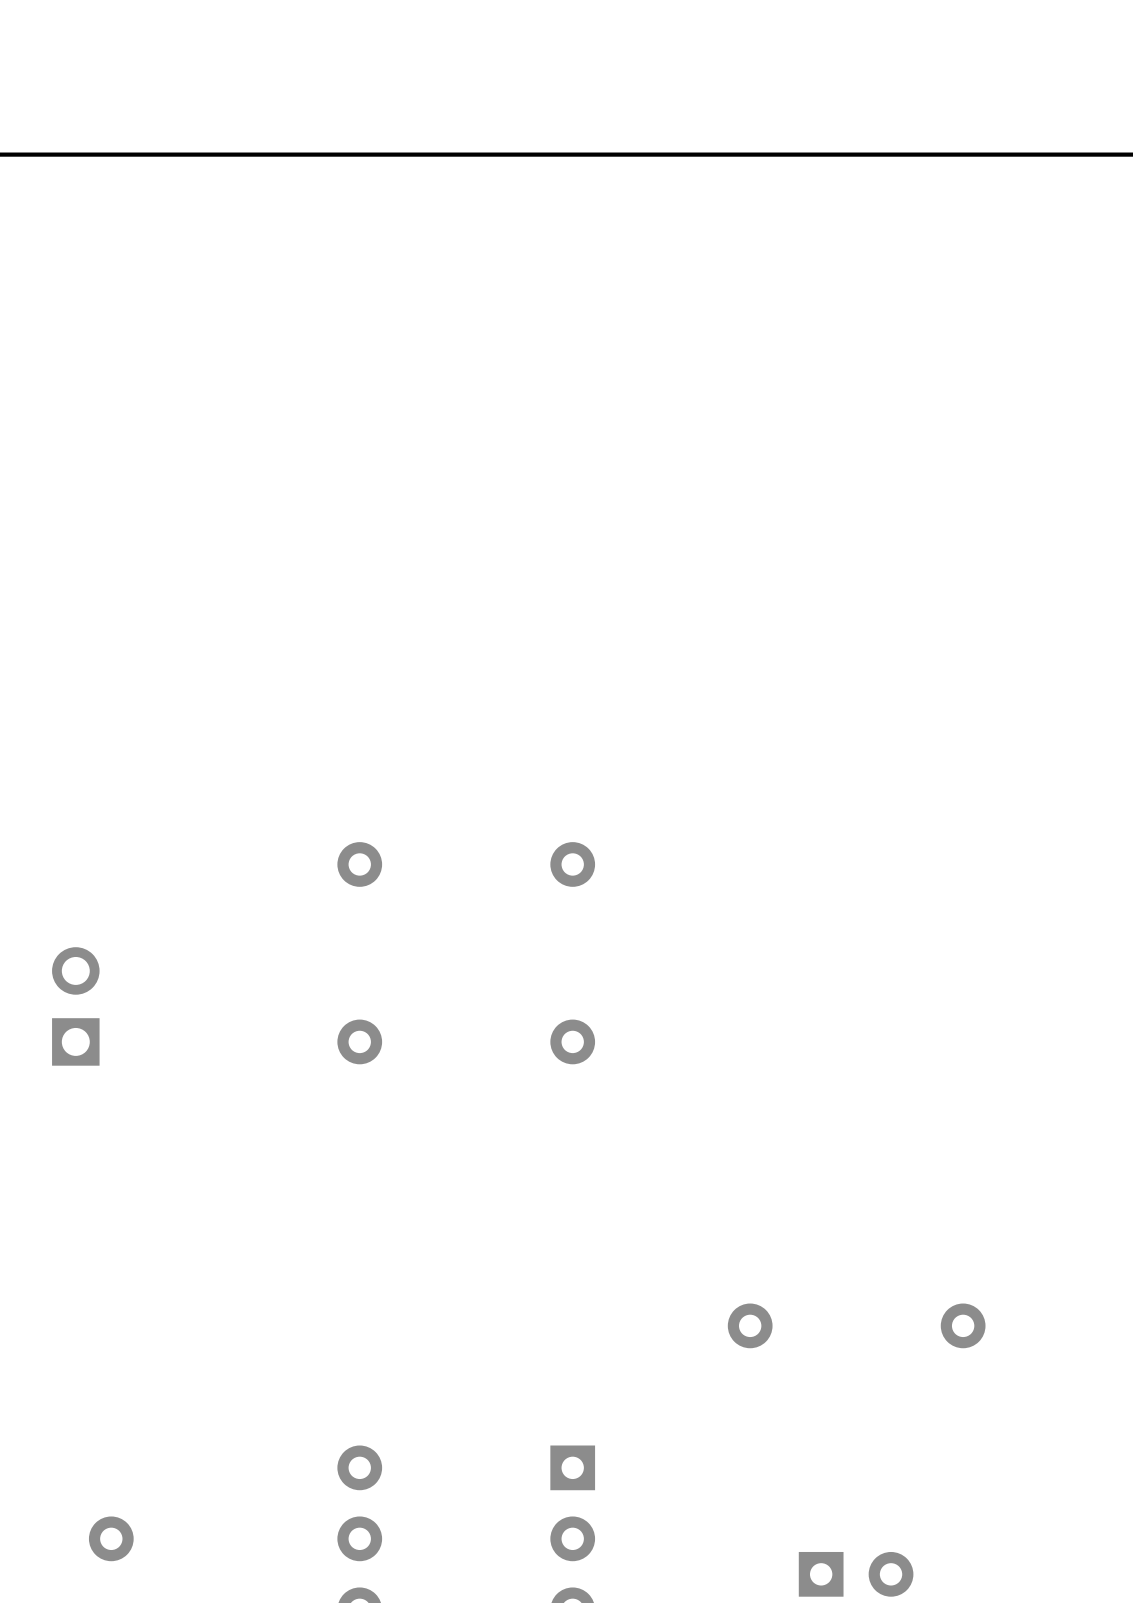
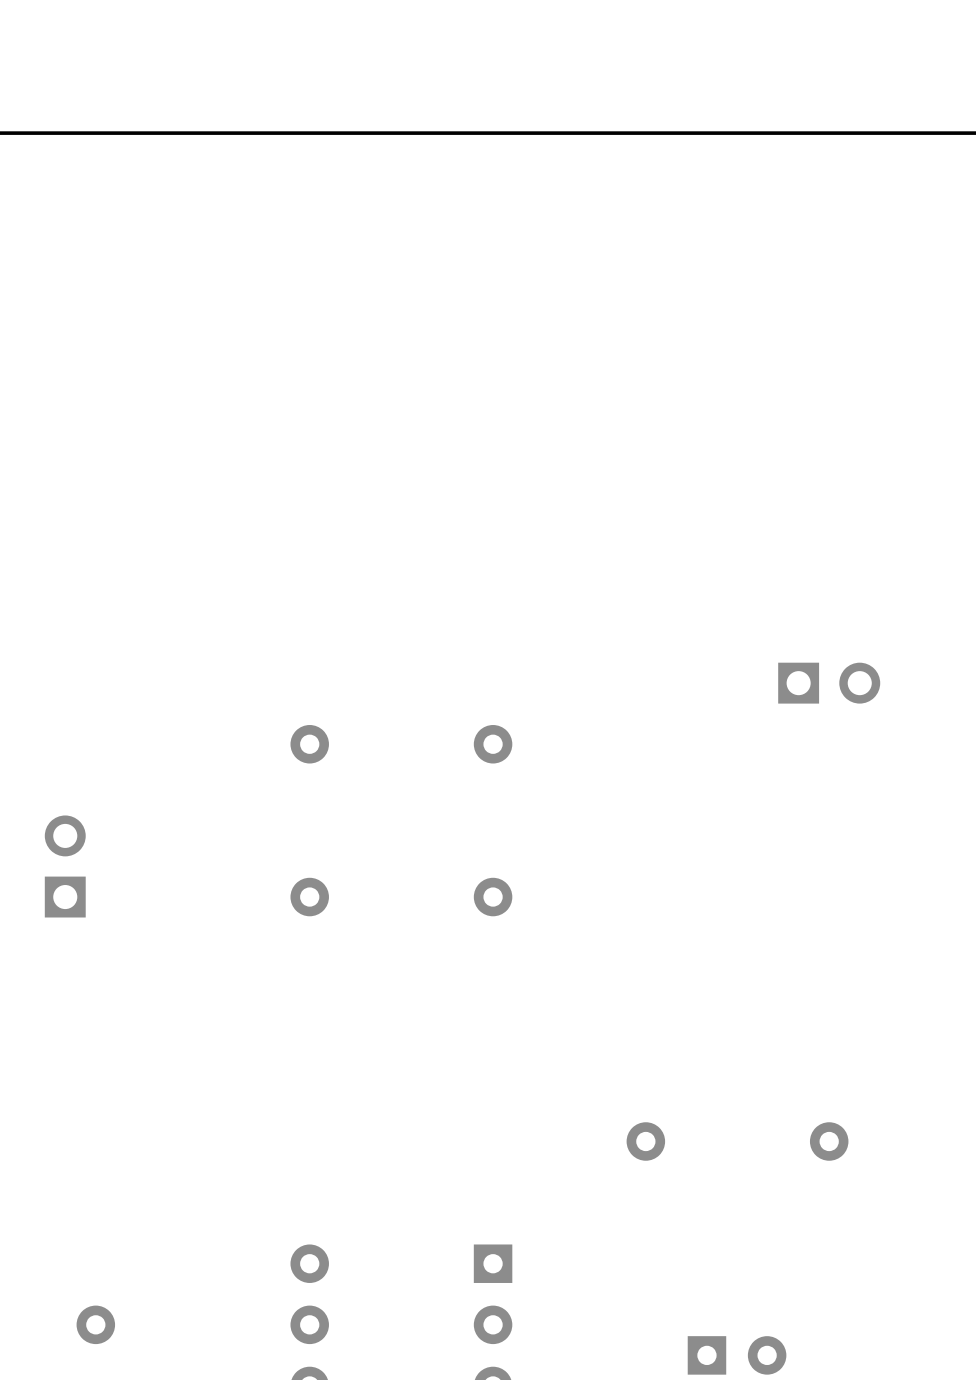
part: none -> (829, 683)

